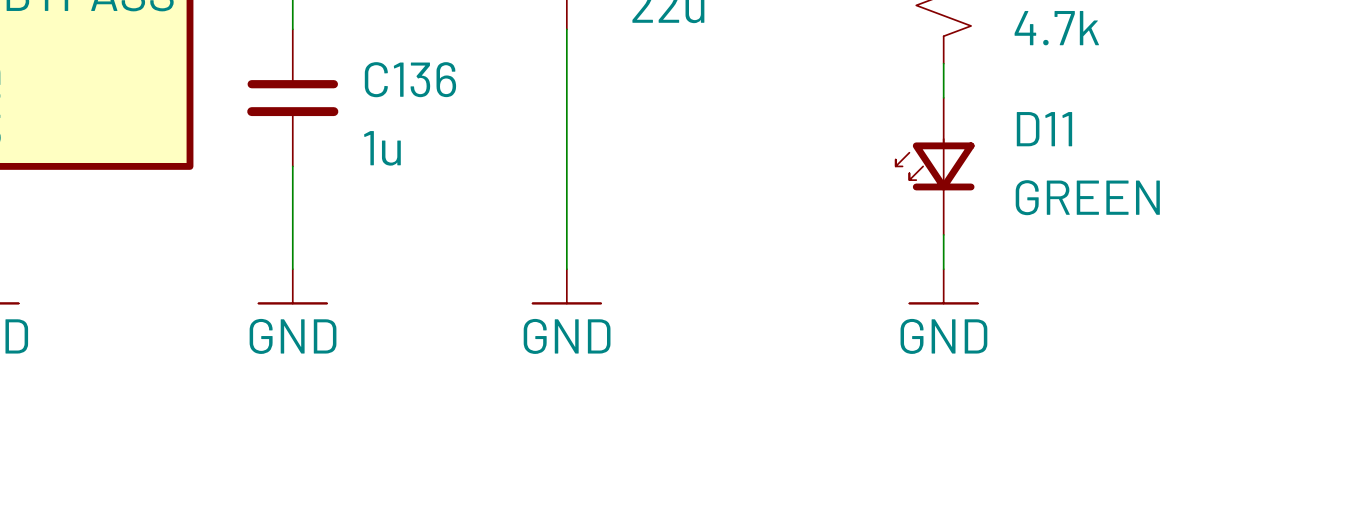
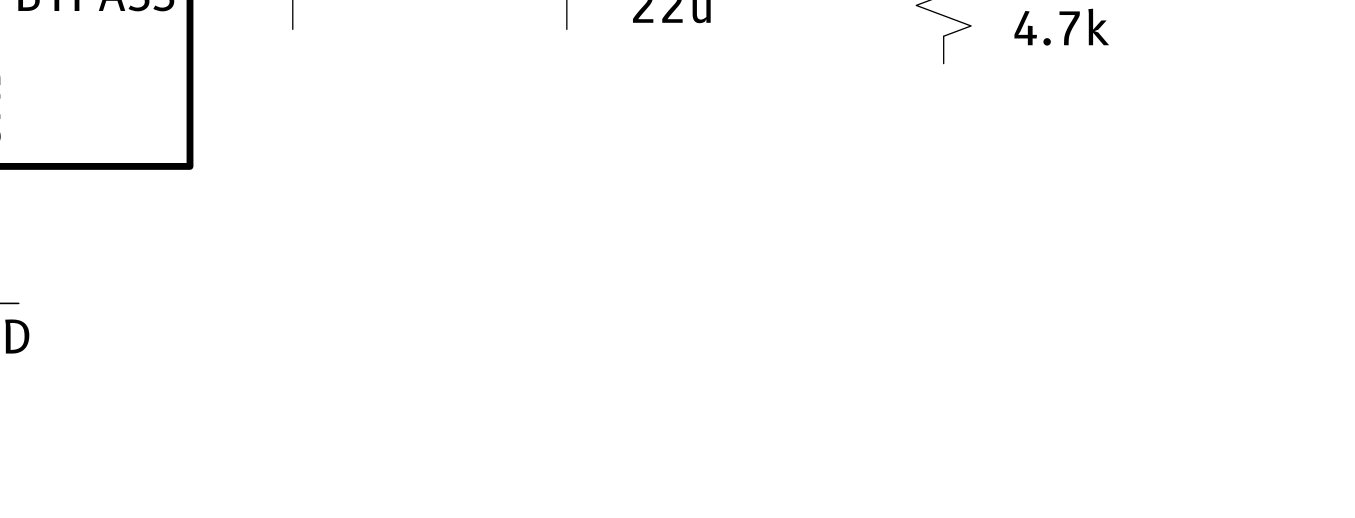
wire: (566, 29) (566, 269) -> none
wire: (943, 63) (943, 97) -> none
C136: 1u (292, 97) -> none
wire: (292, 166) (292, 269) -> none
D11: GREEN (935, 166) -> none
wire: (943, 234) (943, 269) -> none
power symbol: GND (292, 286) -> none
power symbol: GND (566, 286) -> none
power symbol: GND (943, 286) -> none

